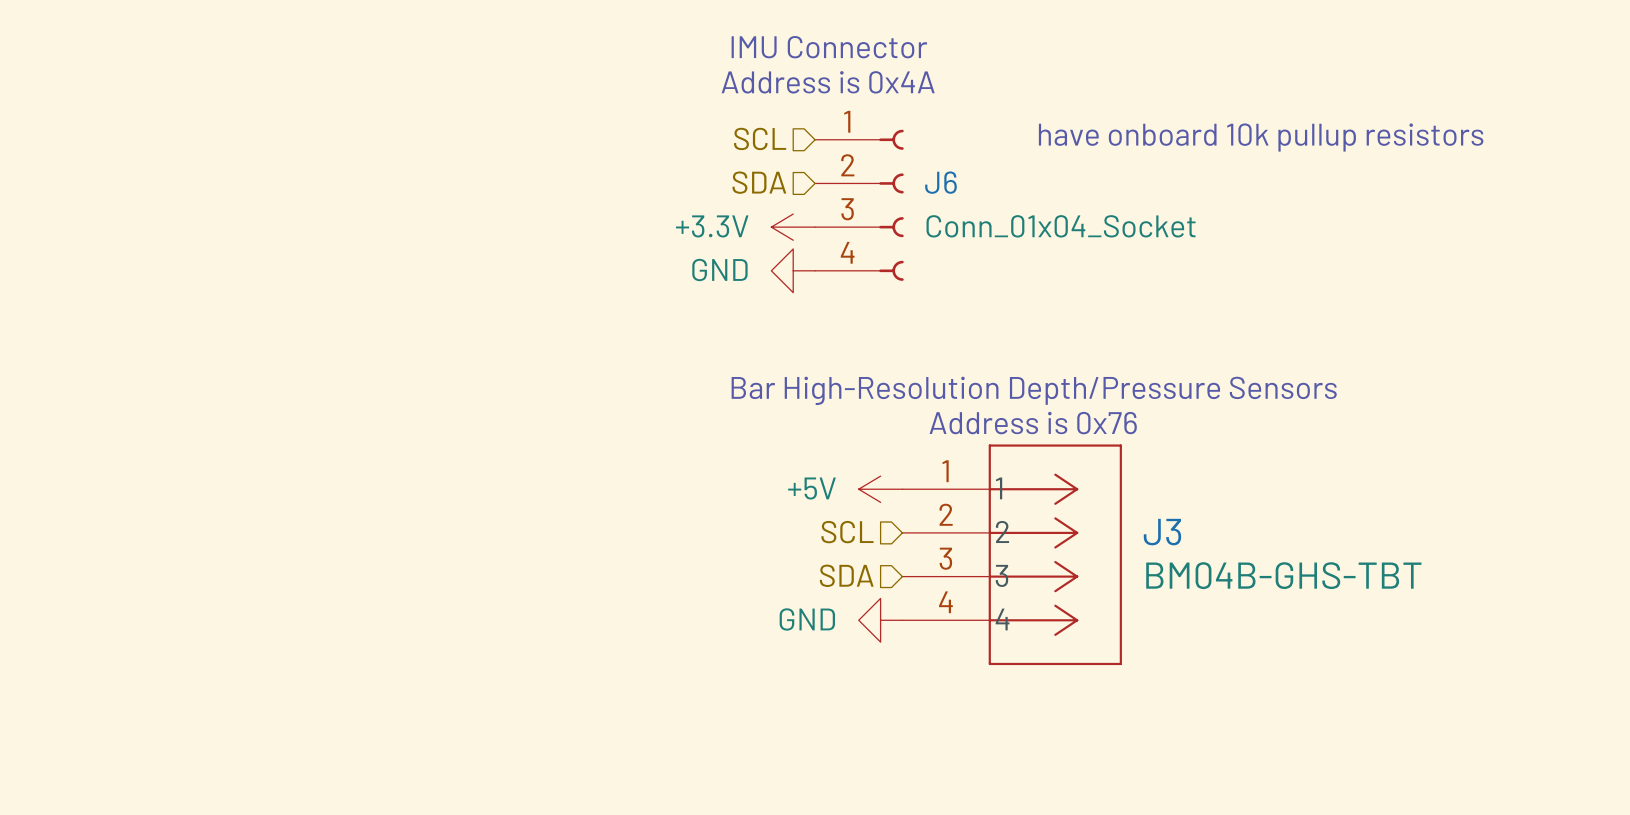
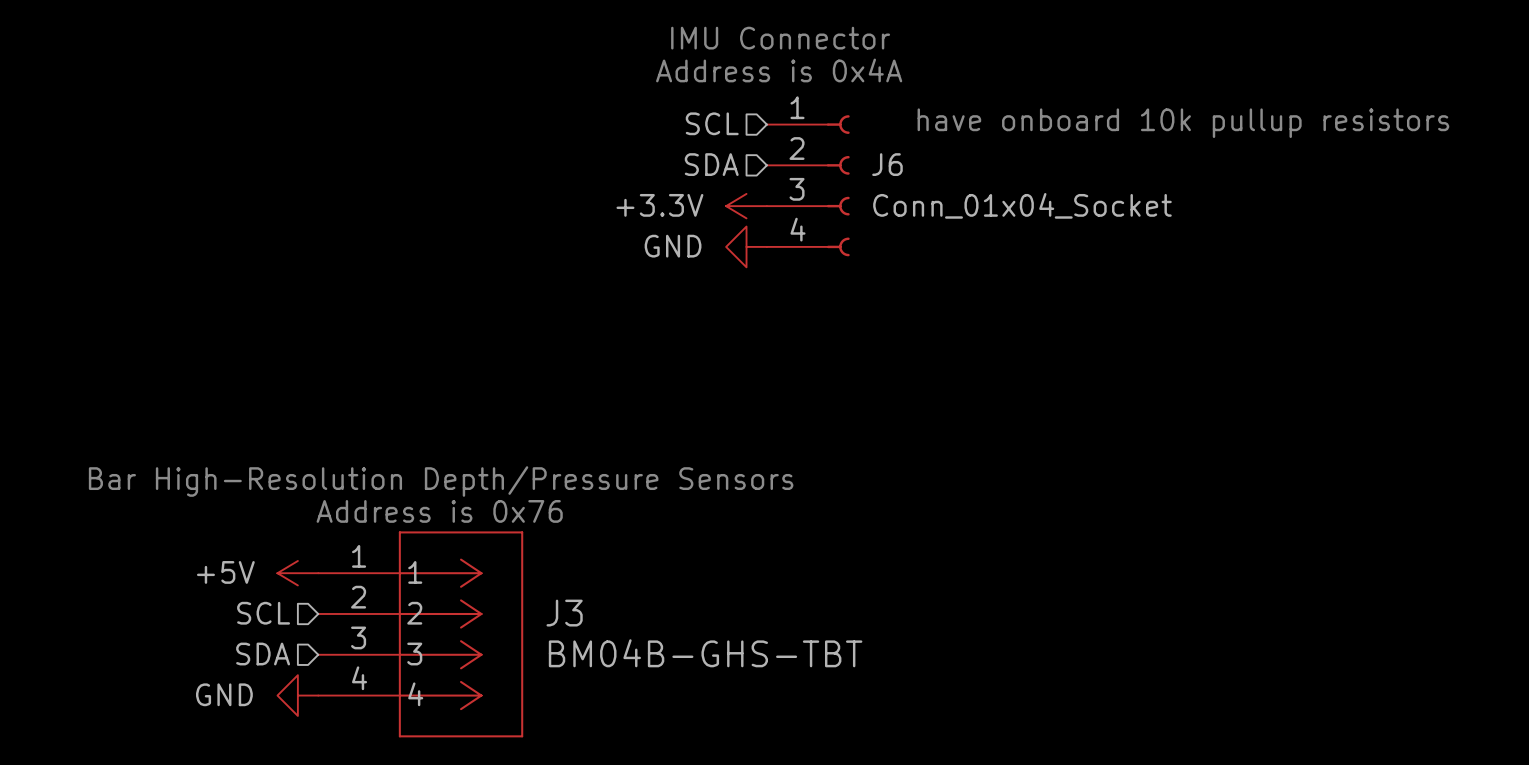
text: Bar High-Resolution Depth/Pressure Sensors (1034, 390) -> none
text: Address is 0x76 (1033, 423) -> none
power symbol: +5V (880, 489) -> none
text: none -> Bar High-Resolution Depth/Pressure Sensors (441, 481)
hierarchical label: SCL (847, 532) -> none
text: none -> Address is 0x76 (439, 511)
J3 position: (1012, 554) -> (420, 634)
hierarchical label: SDA (846, 575) -> none
power symbol: none -> +5V (297, 573)
power symbol: GND (880, 620) -> none
hierarchical label: none -> SCL (263, 613)
hierarchical label: none -> SDA (263, 654)
power symbol: none -> GND (297, 695)

